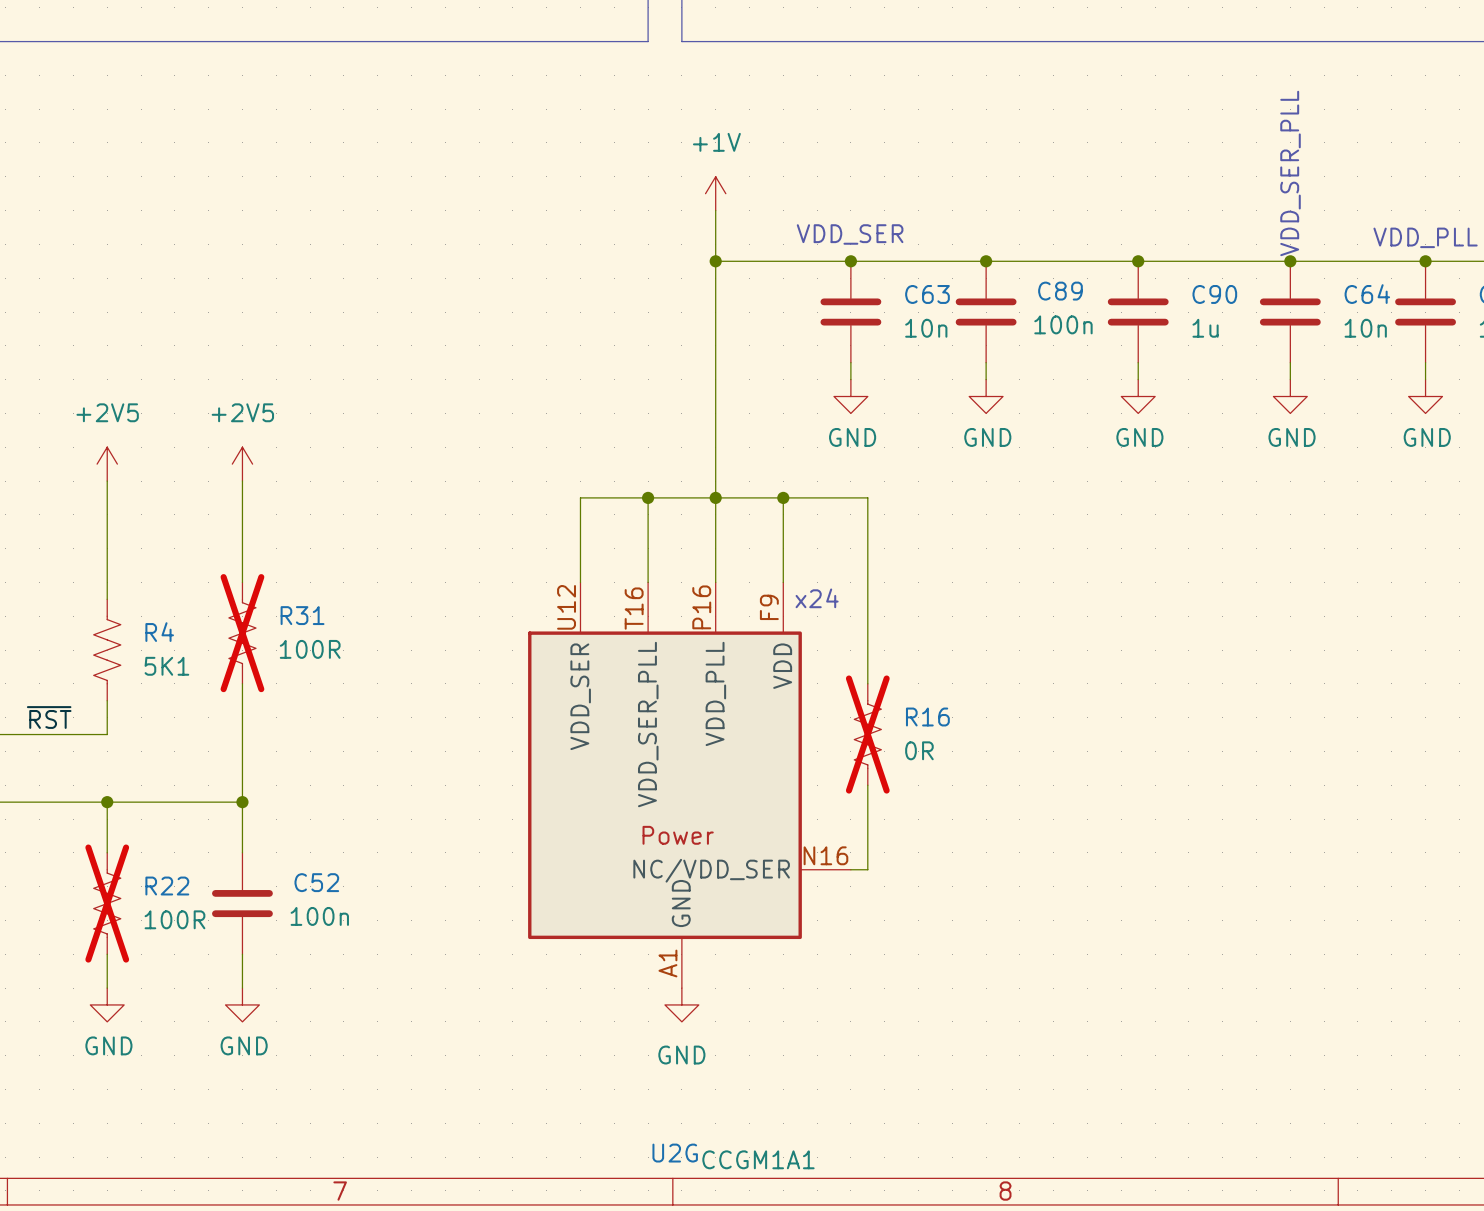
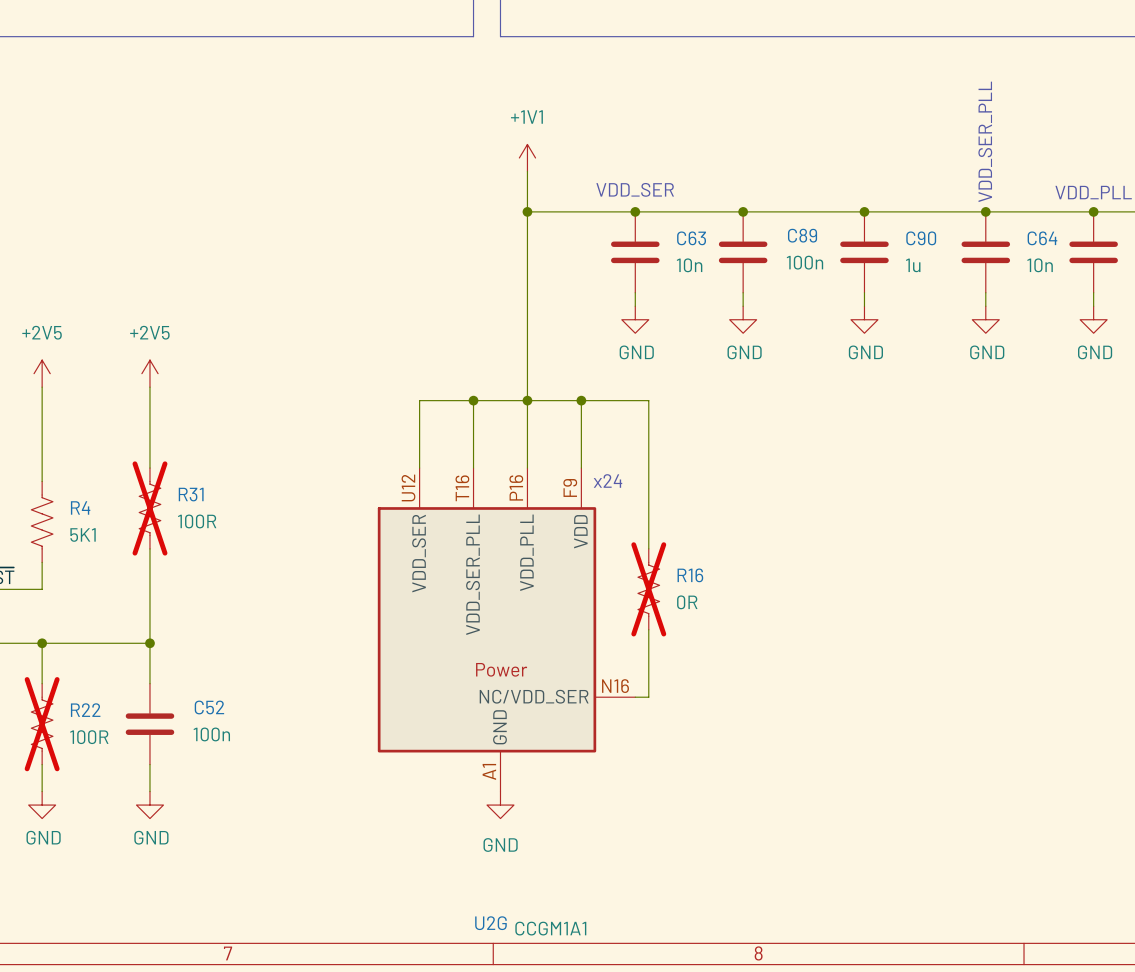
power symbol: +1V (715, 193) -> +1V1 (527, 157)

